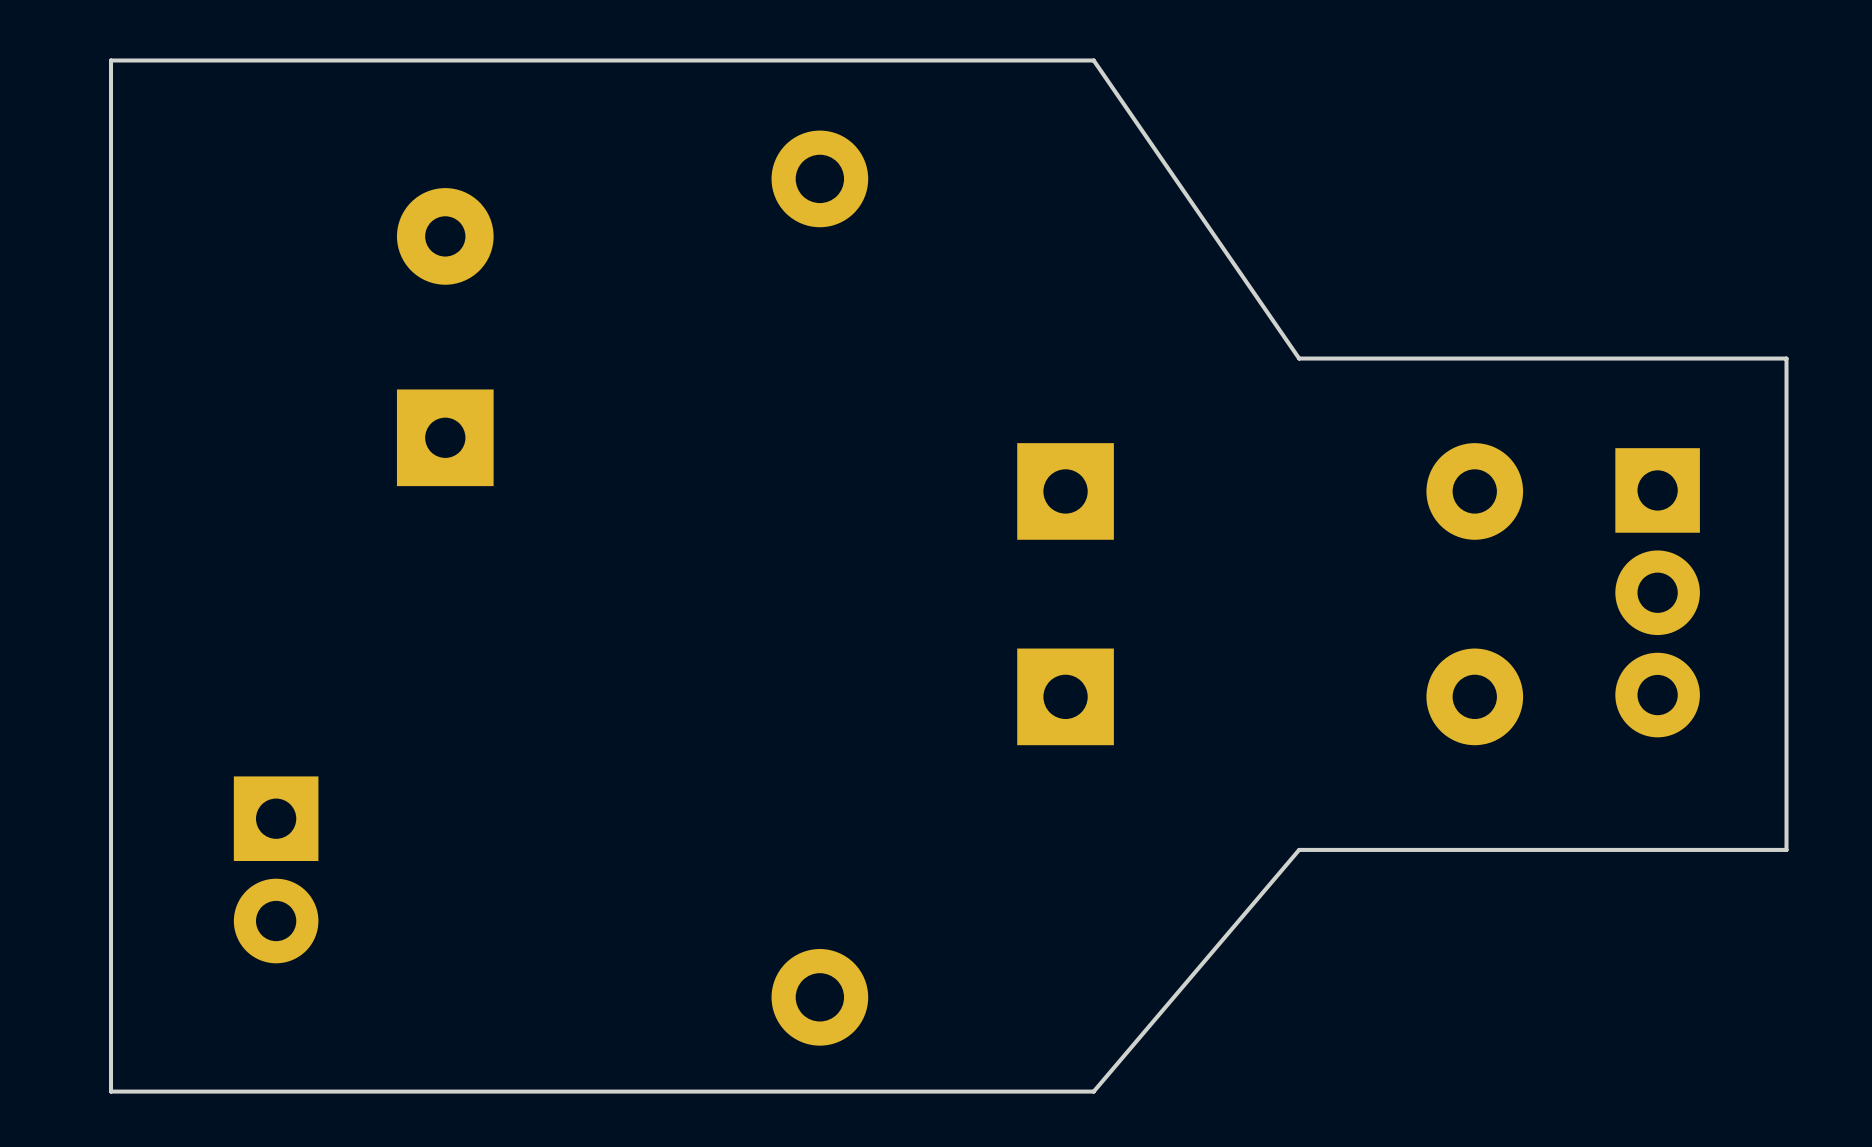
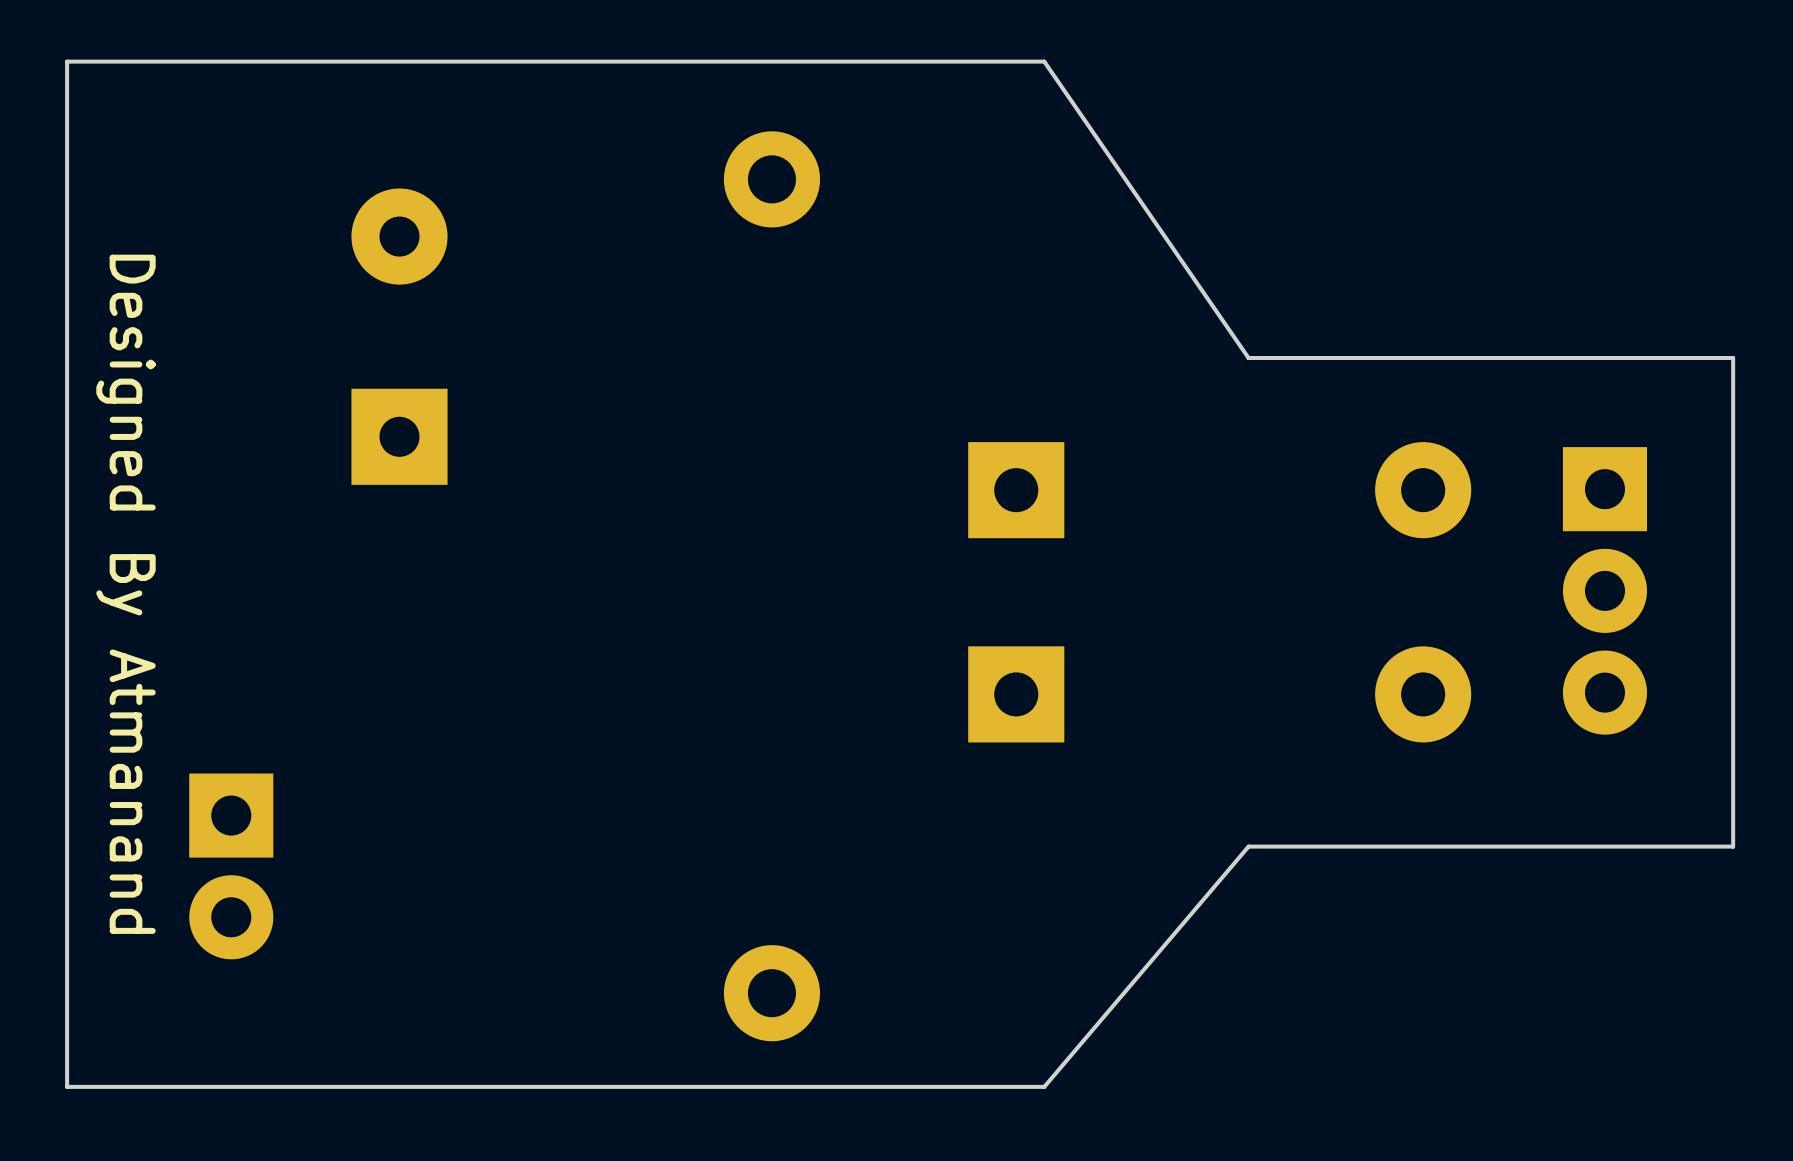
text: none -> Designed By Atmanand (125, 594)

